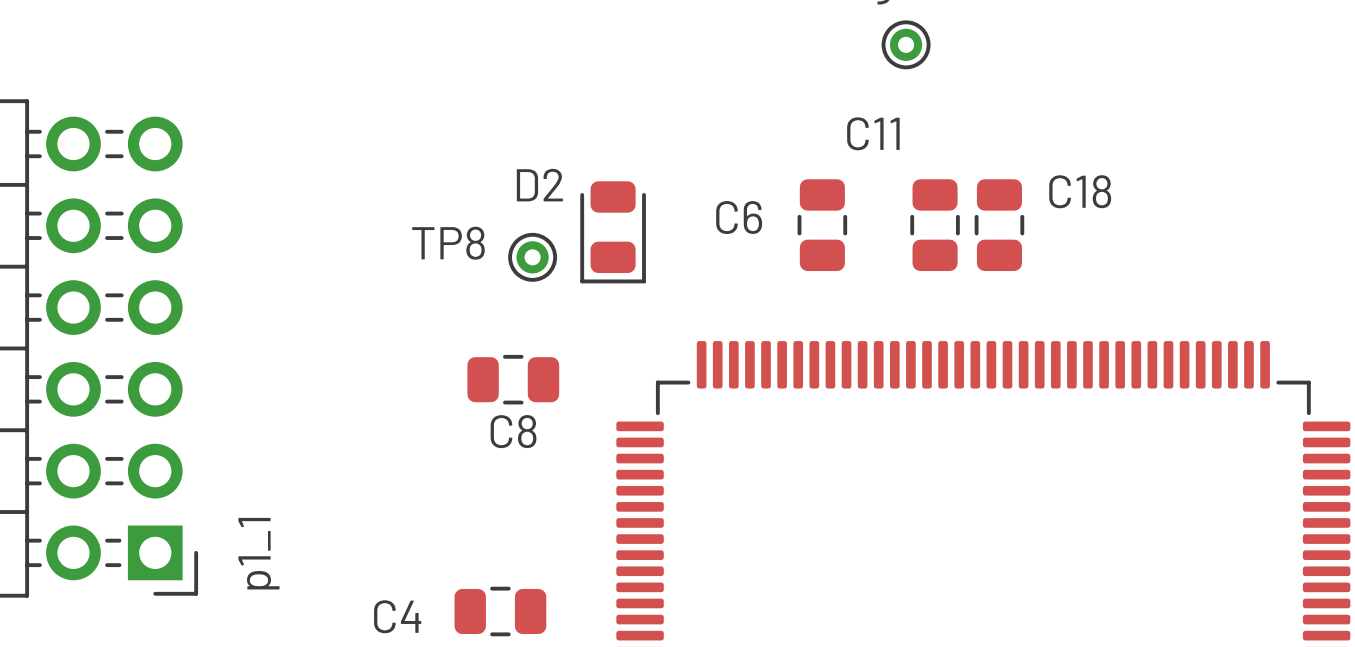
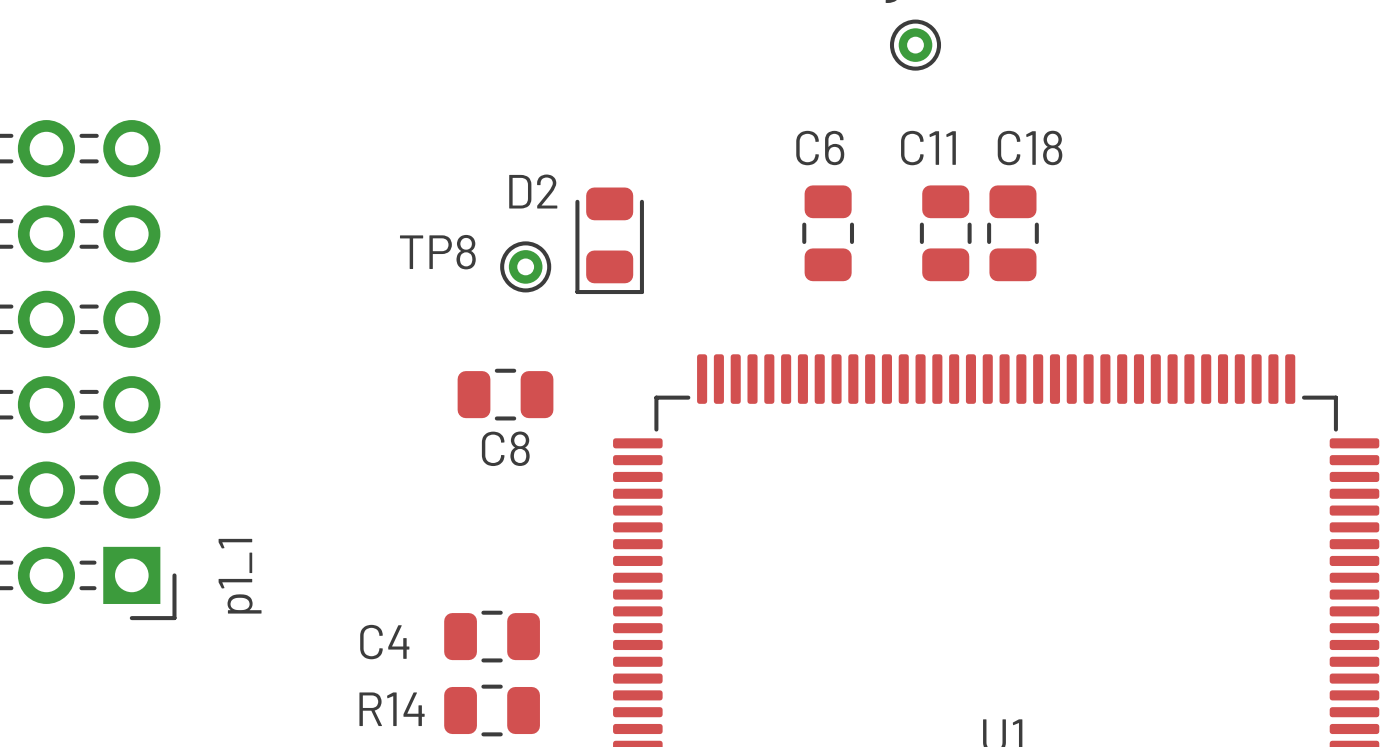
C11 name position: C11 (873, 133) -> C11 (928, 148)
C18 name position: C18 (1080, 191) -> C18 (1030, 148)
C6 name position: C6 (739, 217) -> C6 (820, 148)

